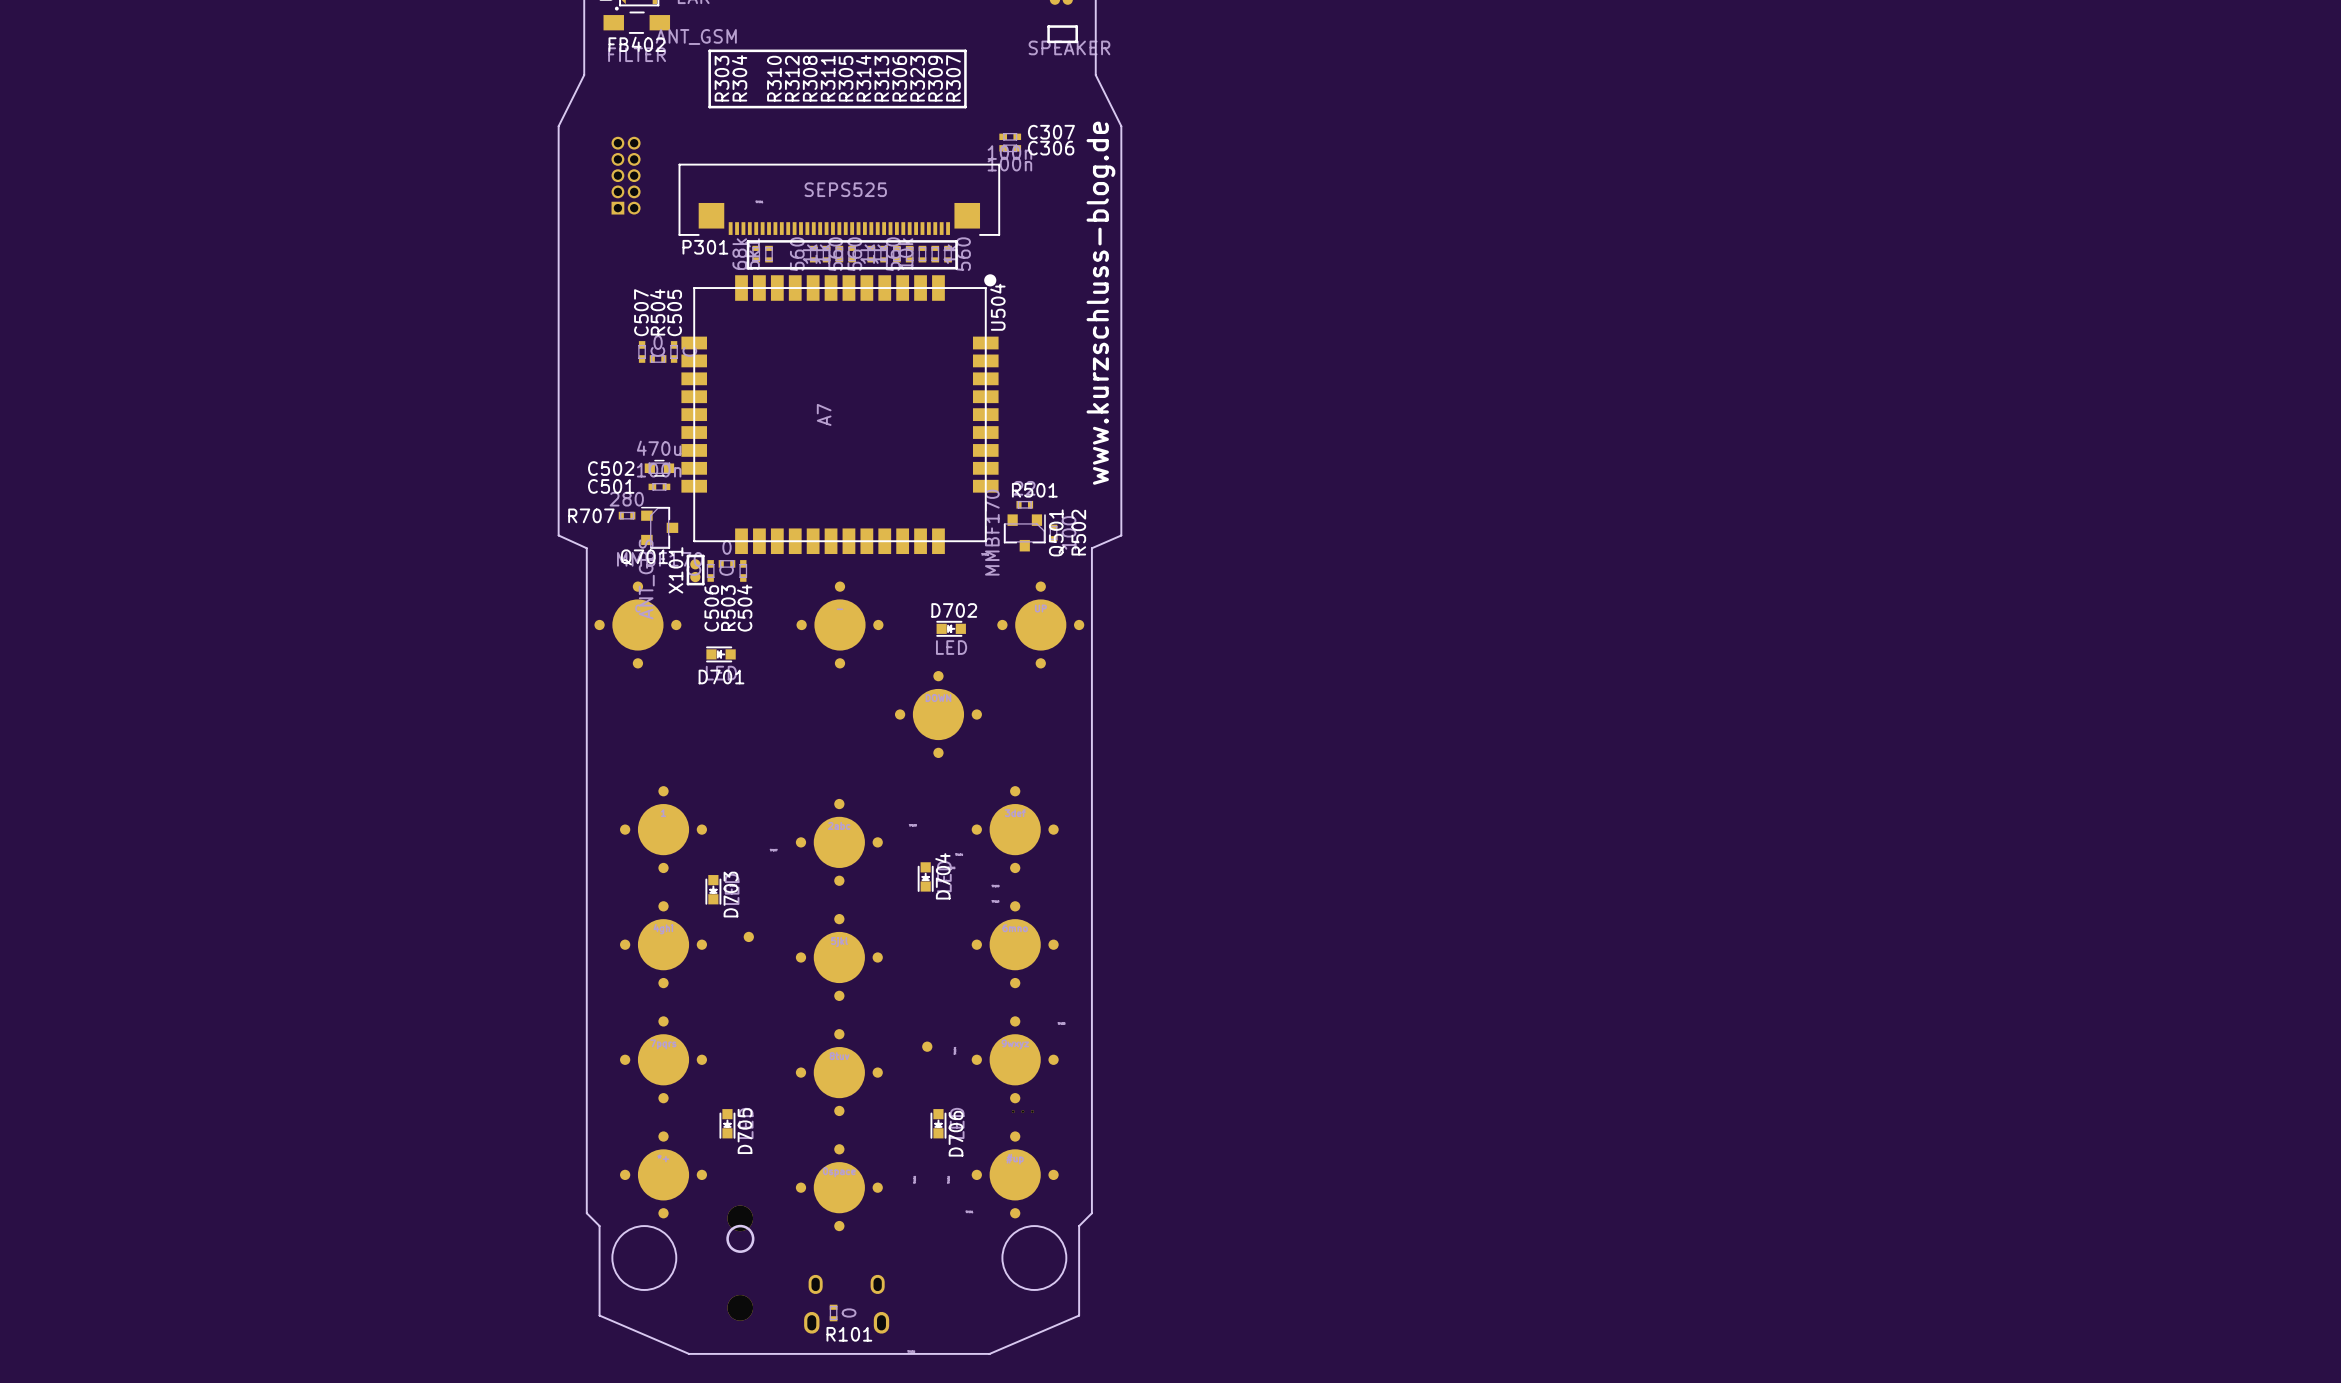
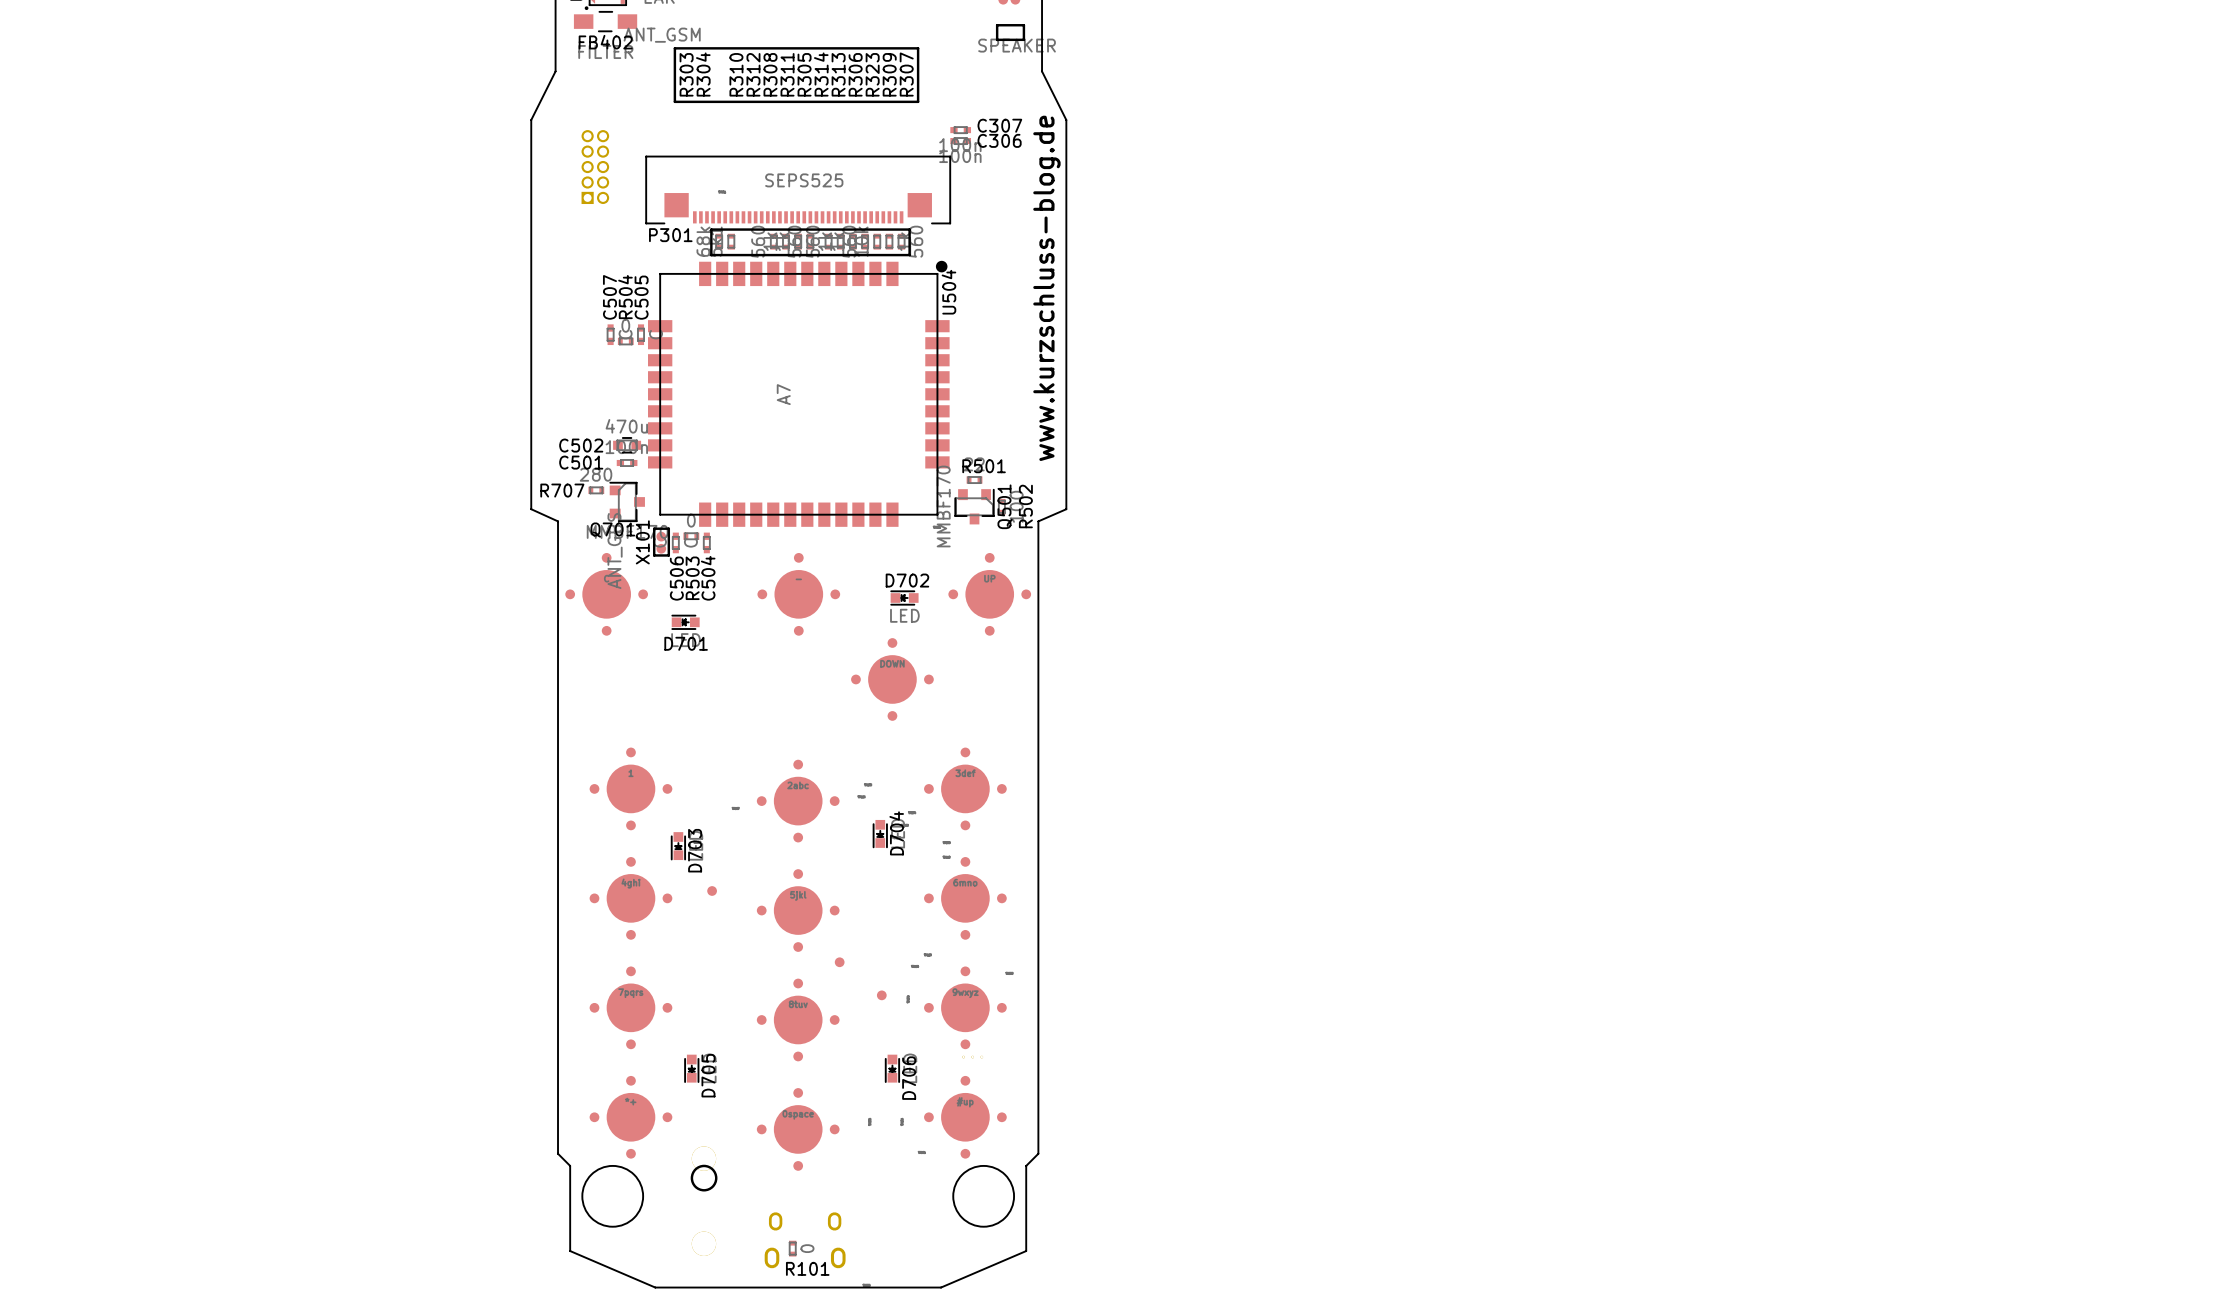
part: none -> (861, 796)
part: none -> (927, 954)
part: none -> (839, 962)
part: none -> (915, 966)

